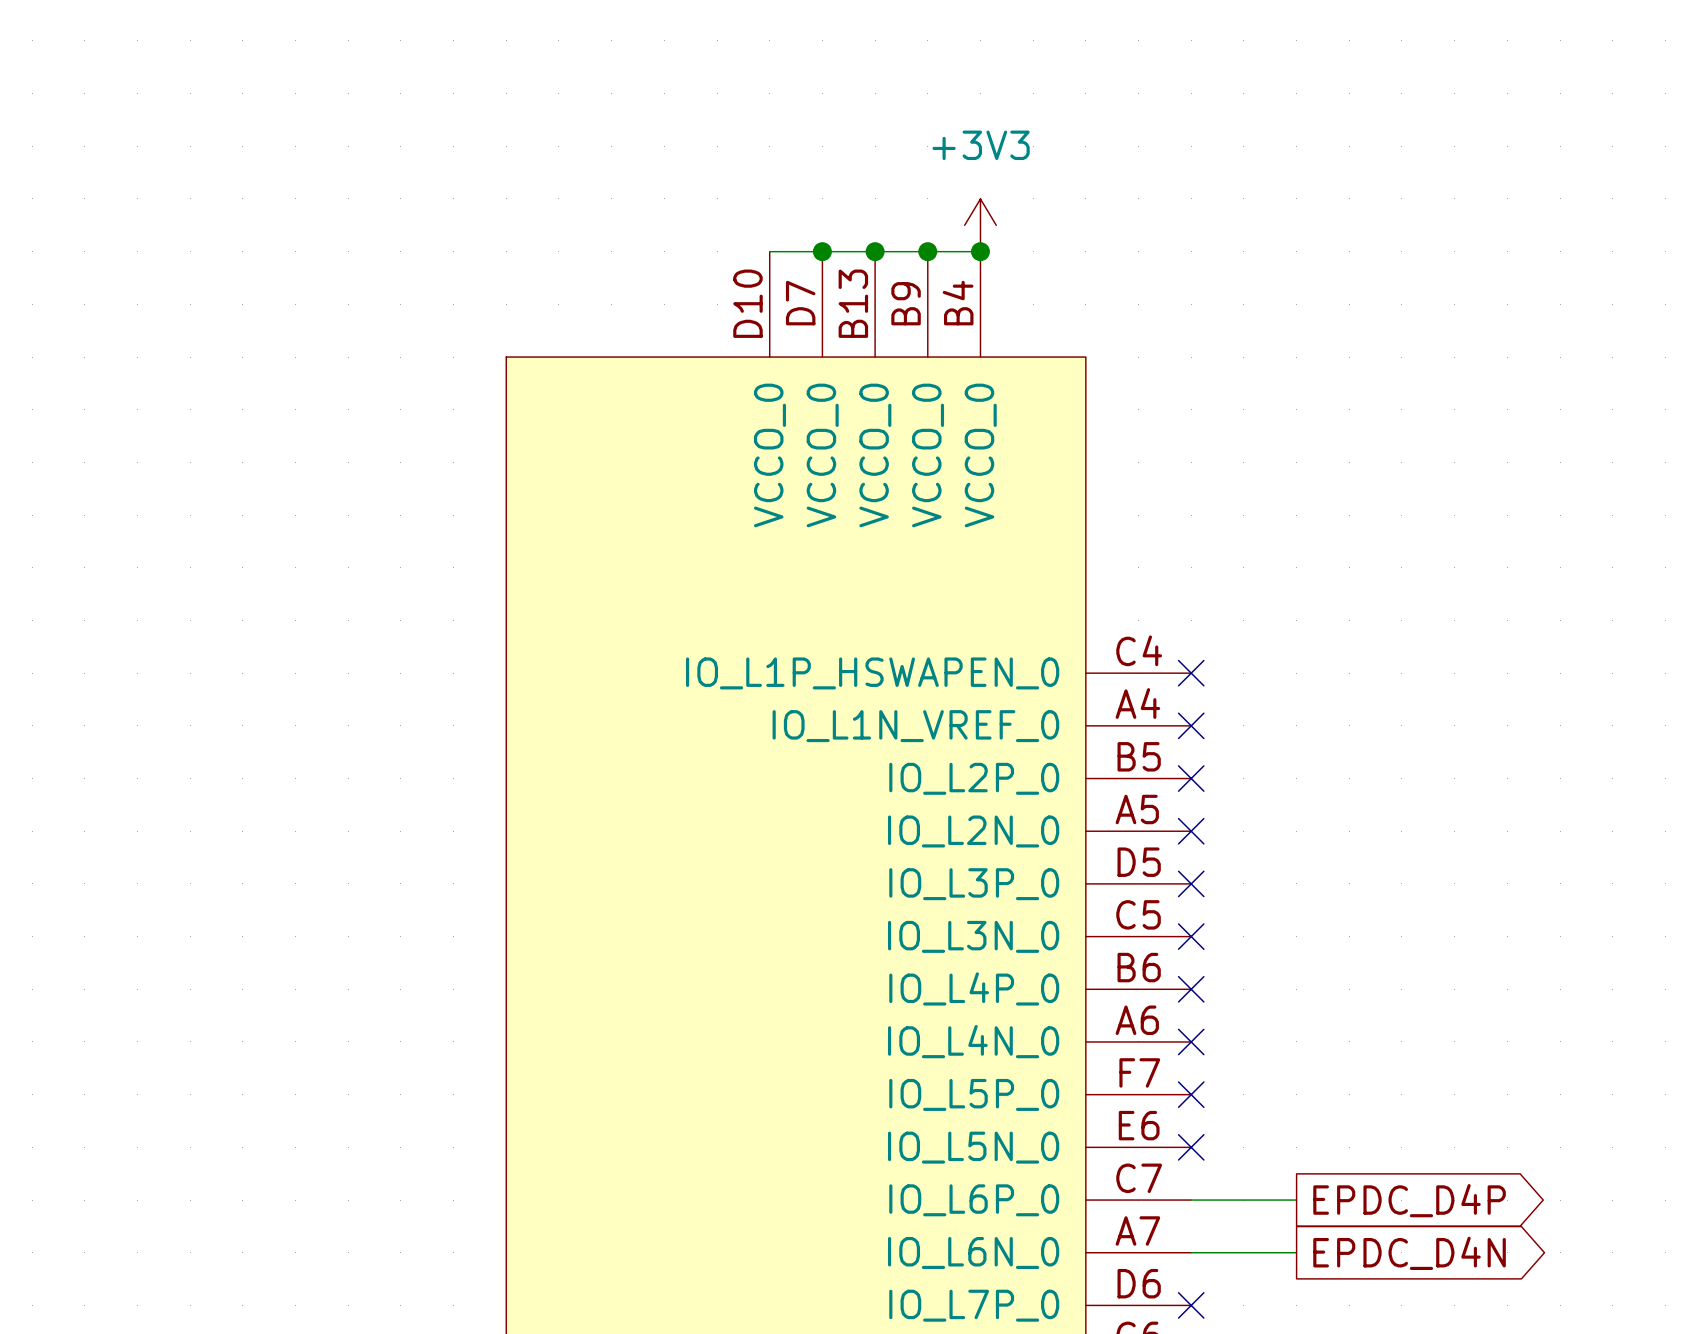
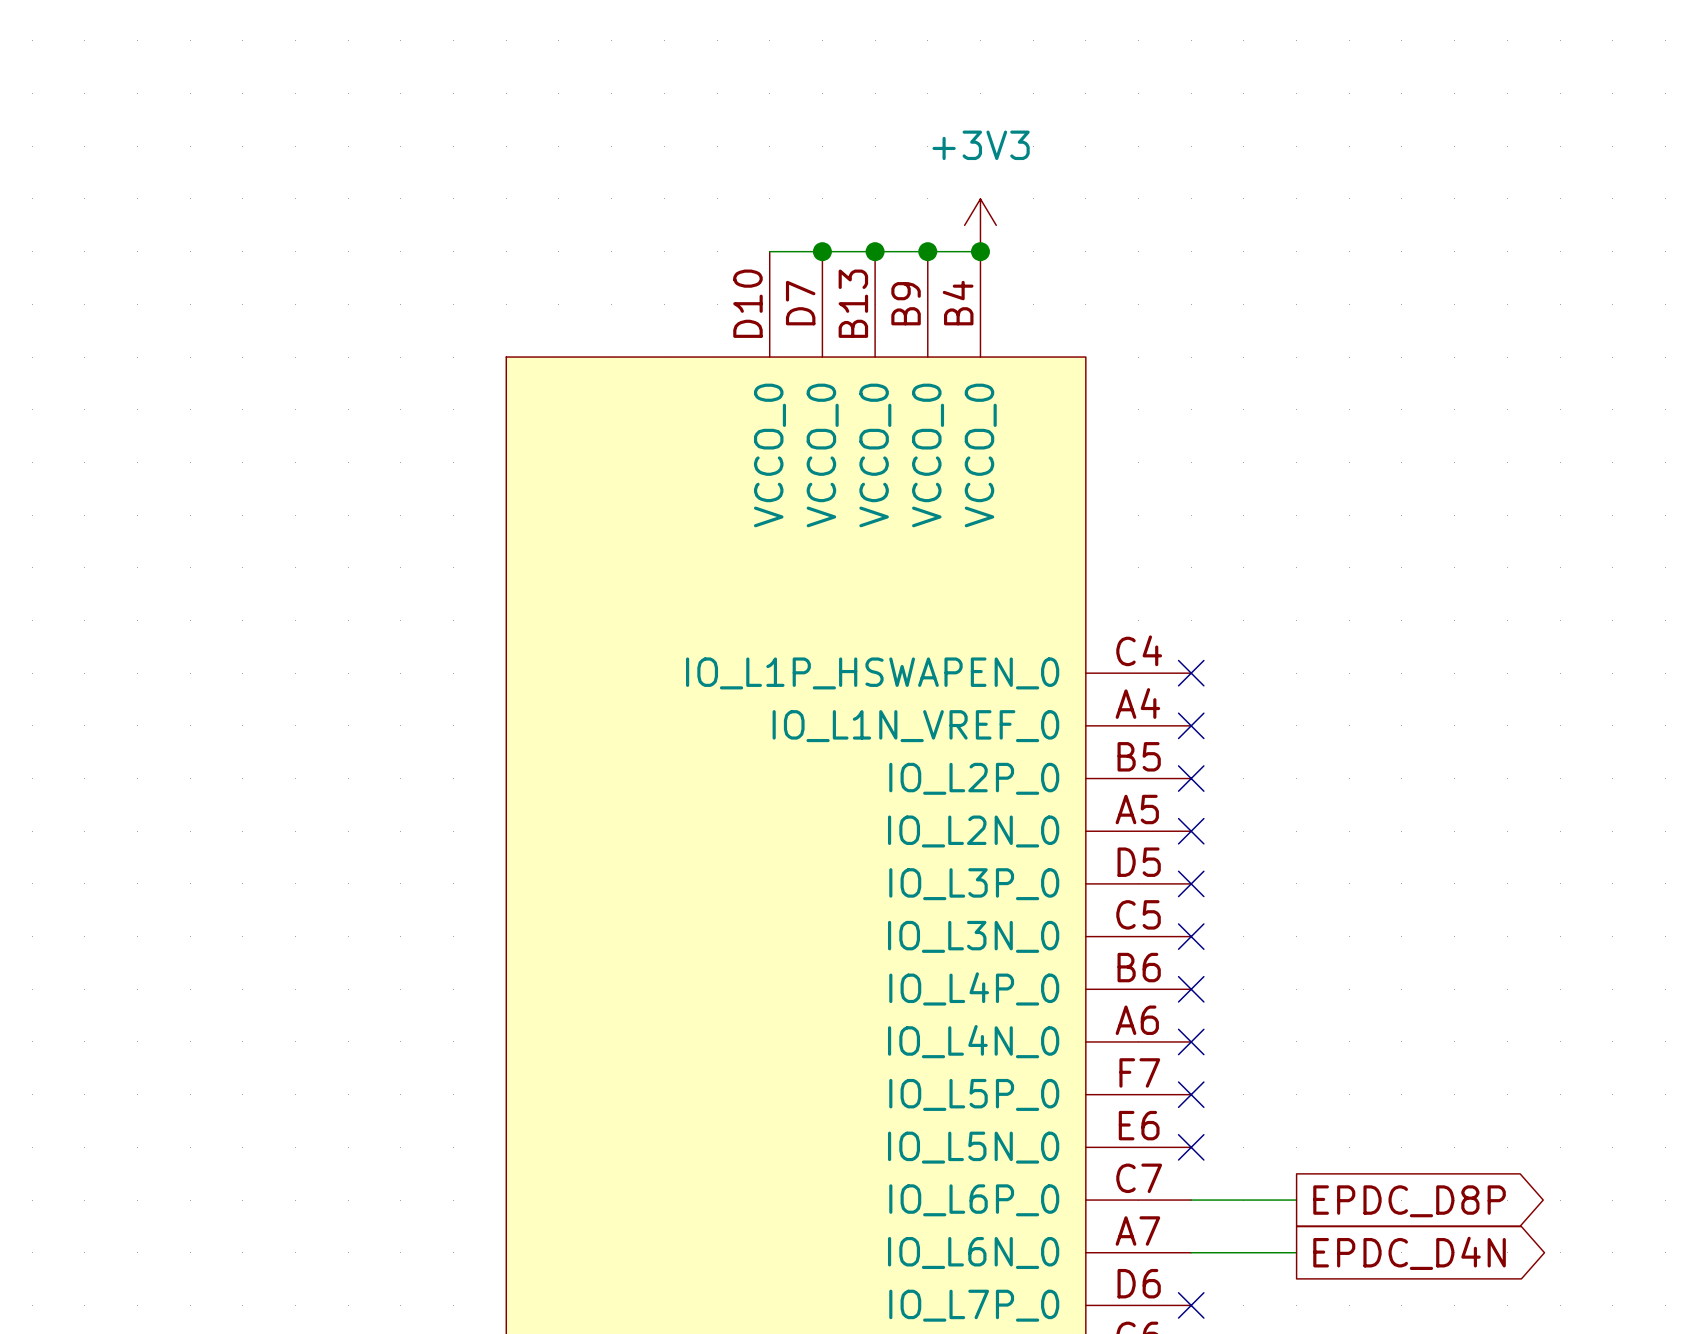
global label: EPDC_D4P (1409, 1200) -> EPDC_D8P (1409, 1201)

